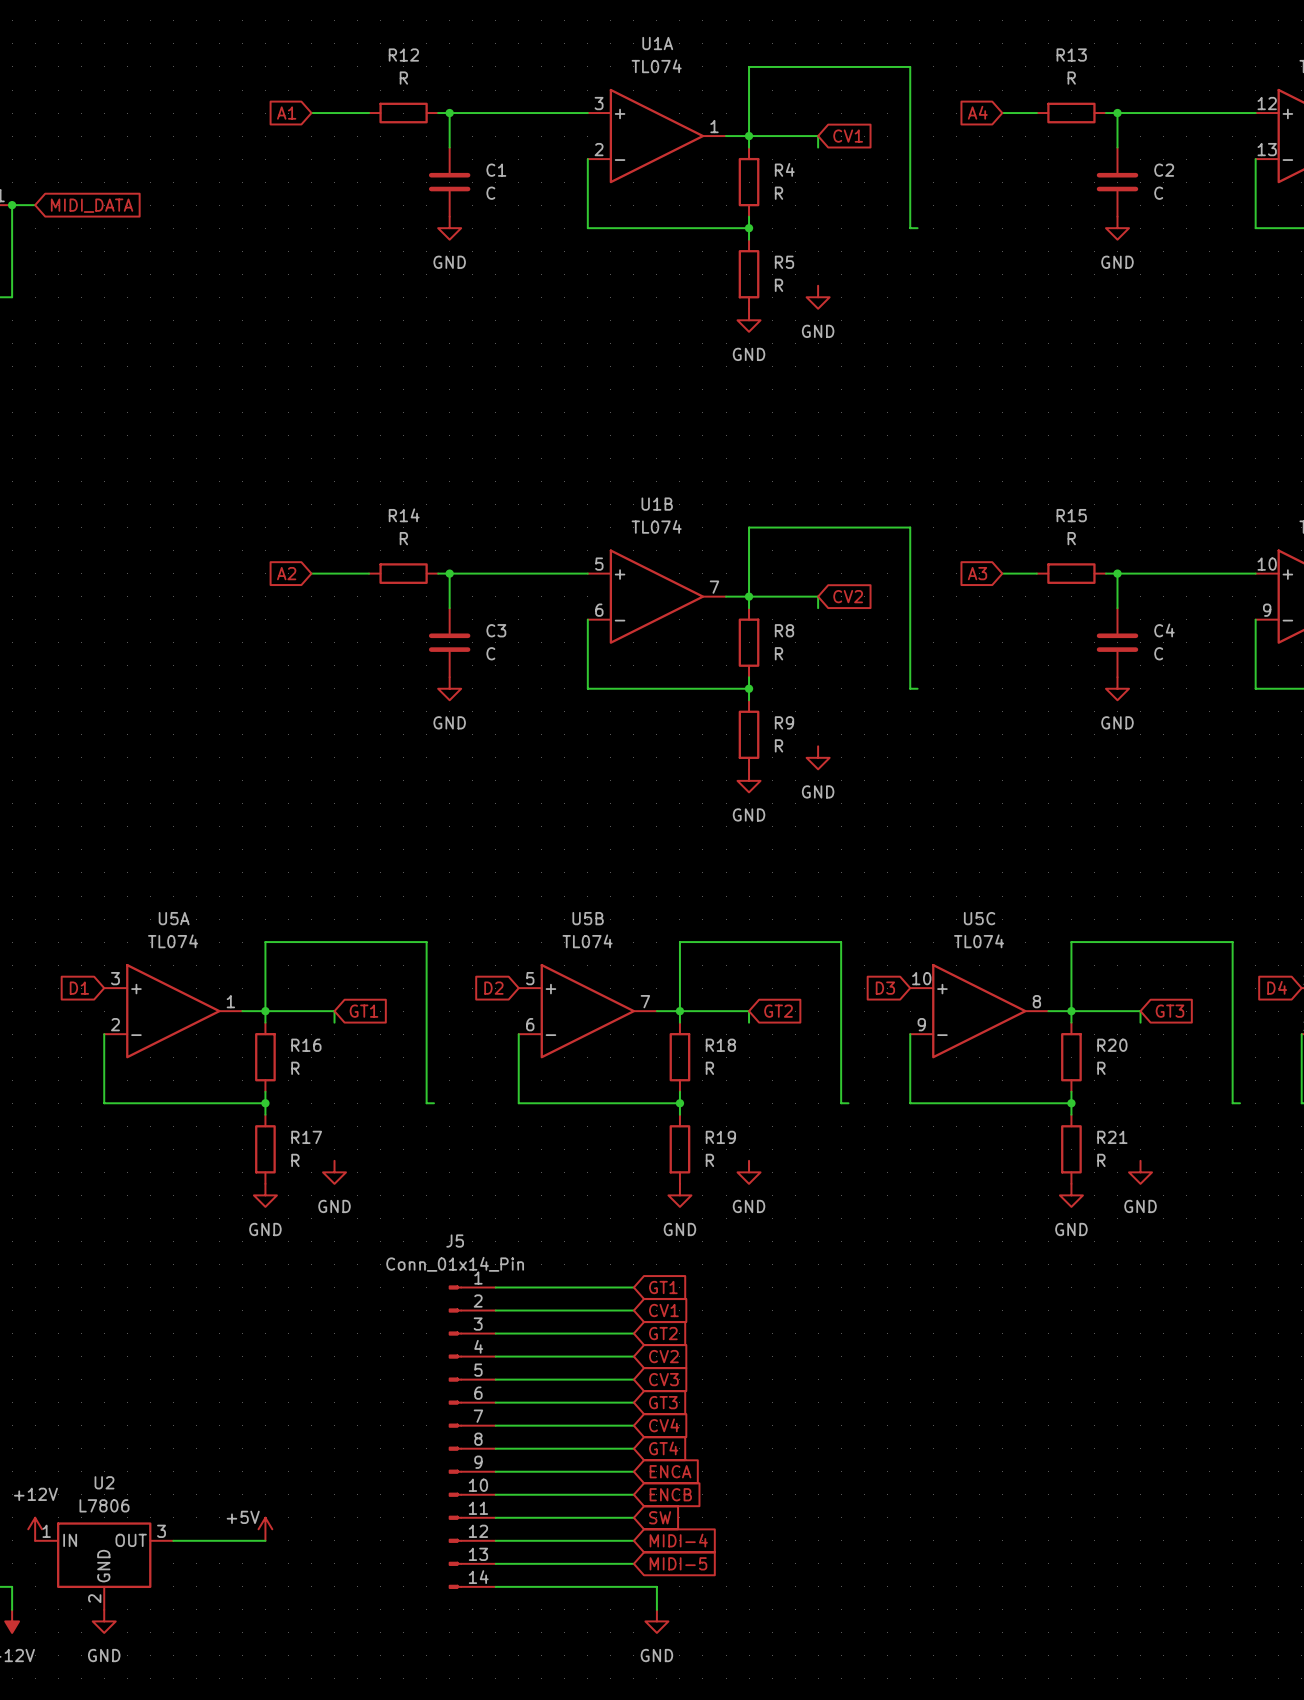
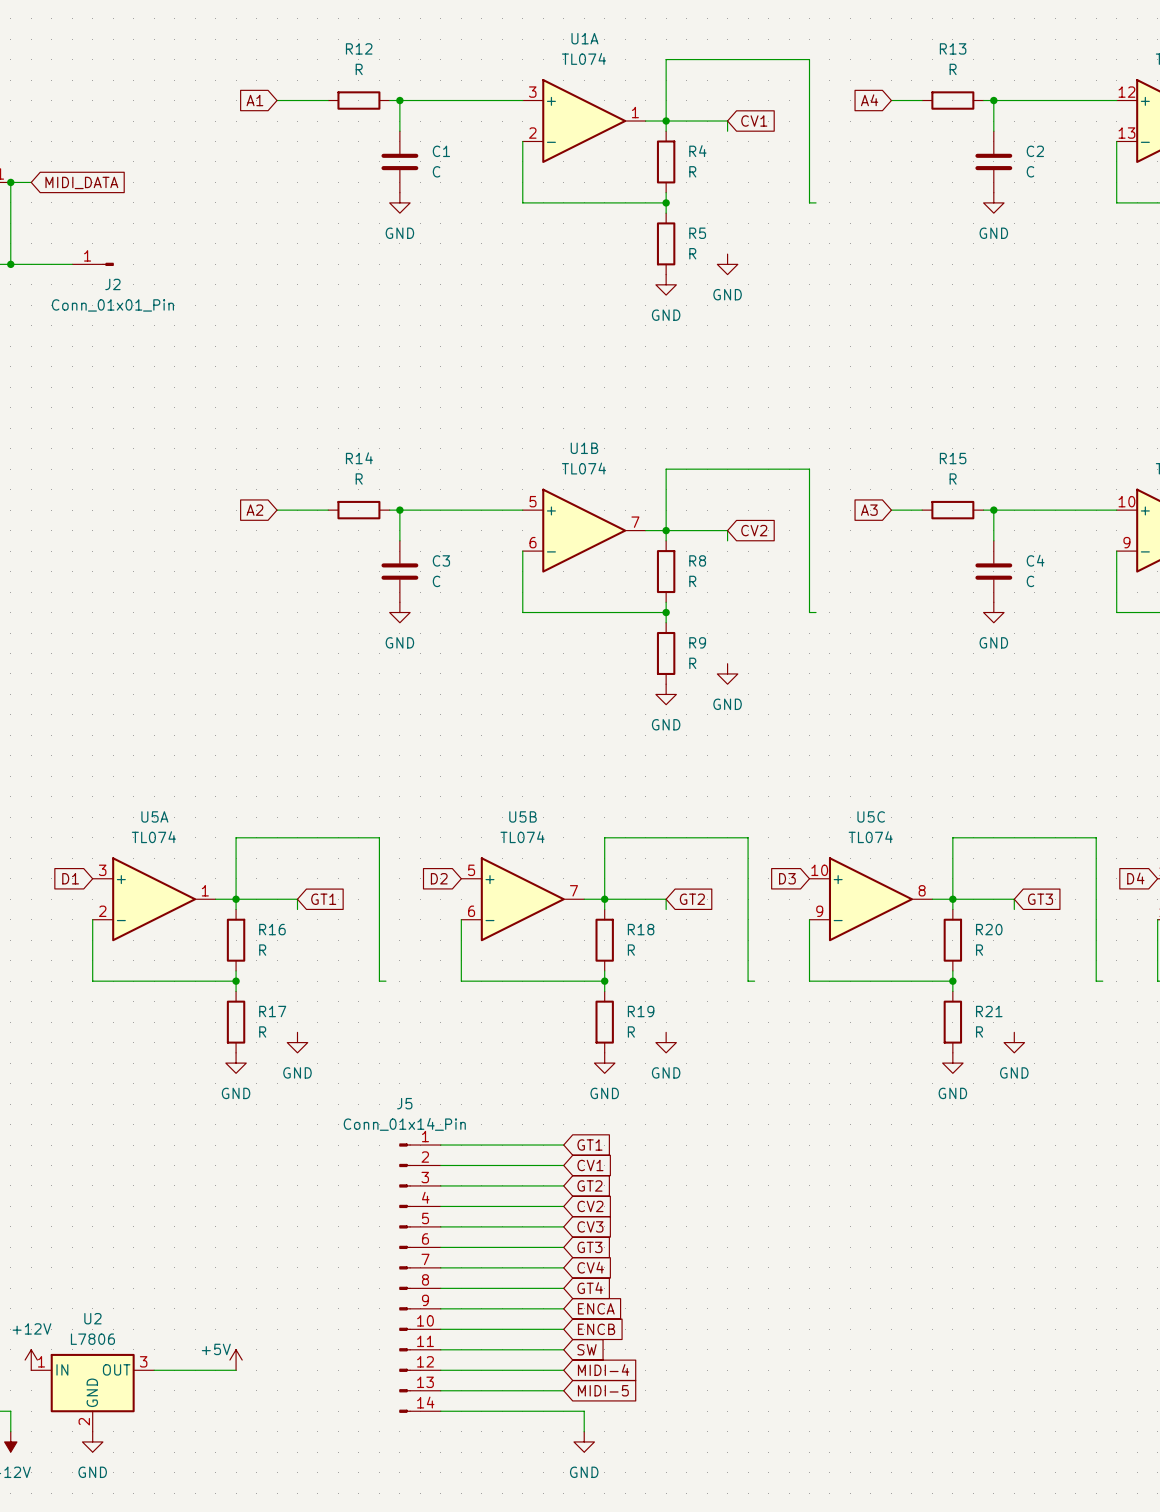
wire: none -> (10, 264) (72, 264)
junction: none -> (10, 264)
J2: none -> Conn_01x01_Pin (93, 264)

